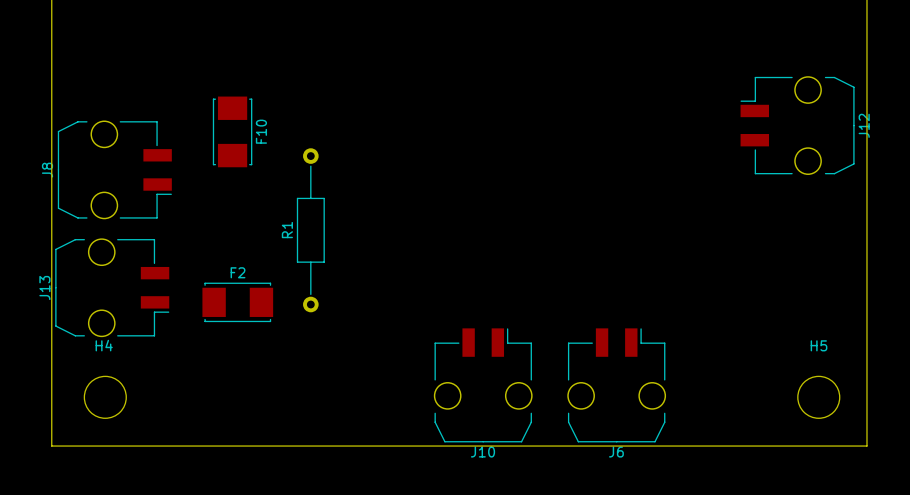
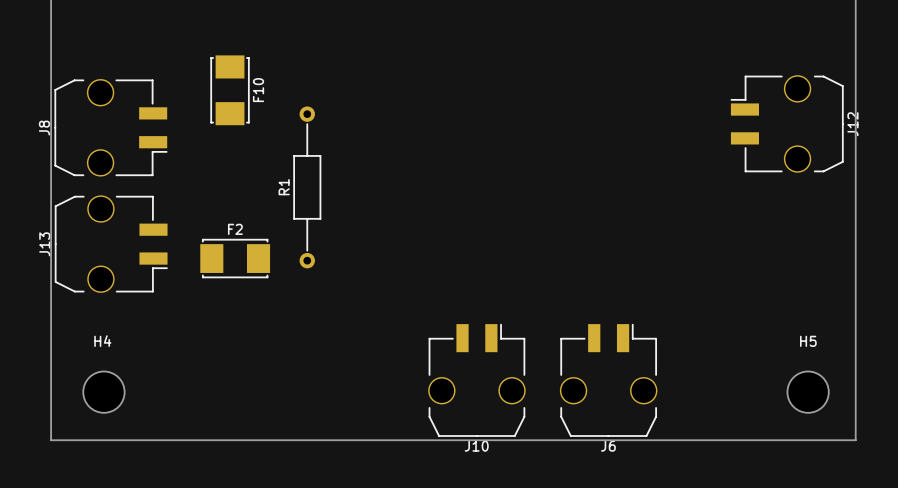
F10 position: (232, 131) -> (230, 90)
J8 position: (114, 169) -> (110, 127)
R1 position: (310, 230) -> (307, 187)
J13 position: (112, 287) -> (111, 244)
F2 position: (237, 302) -> (235, 258)

